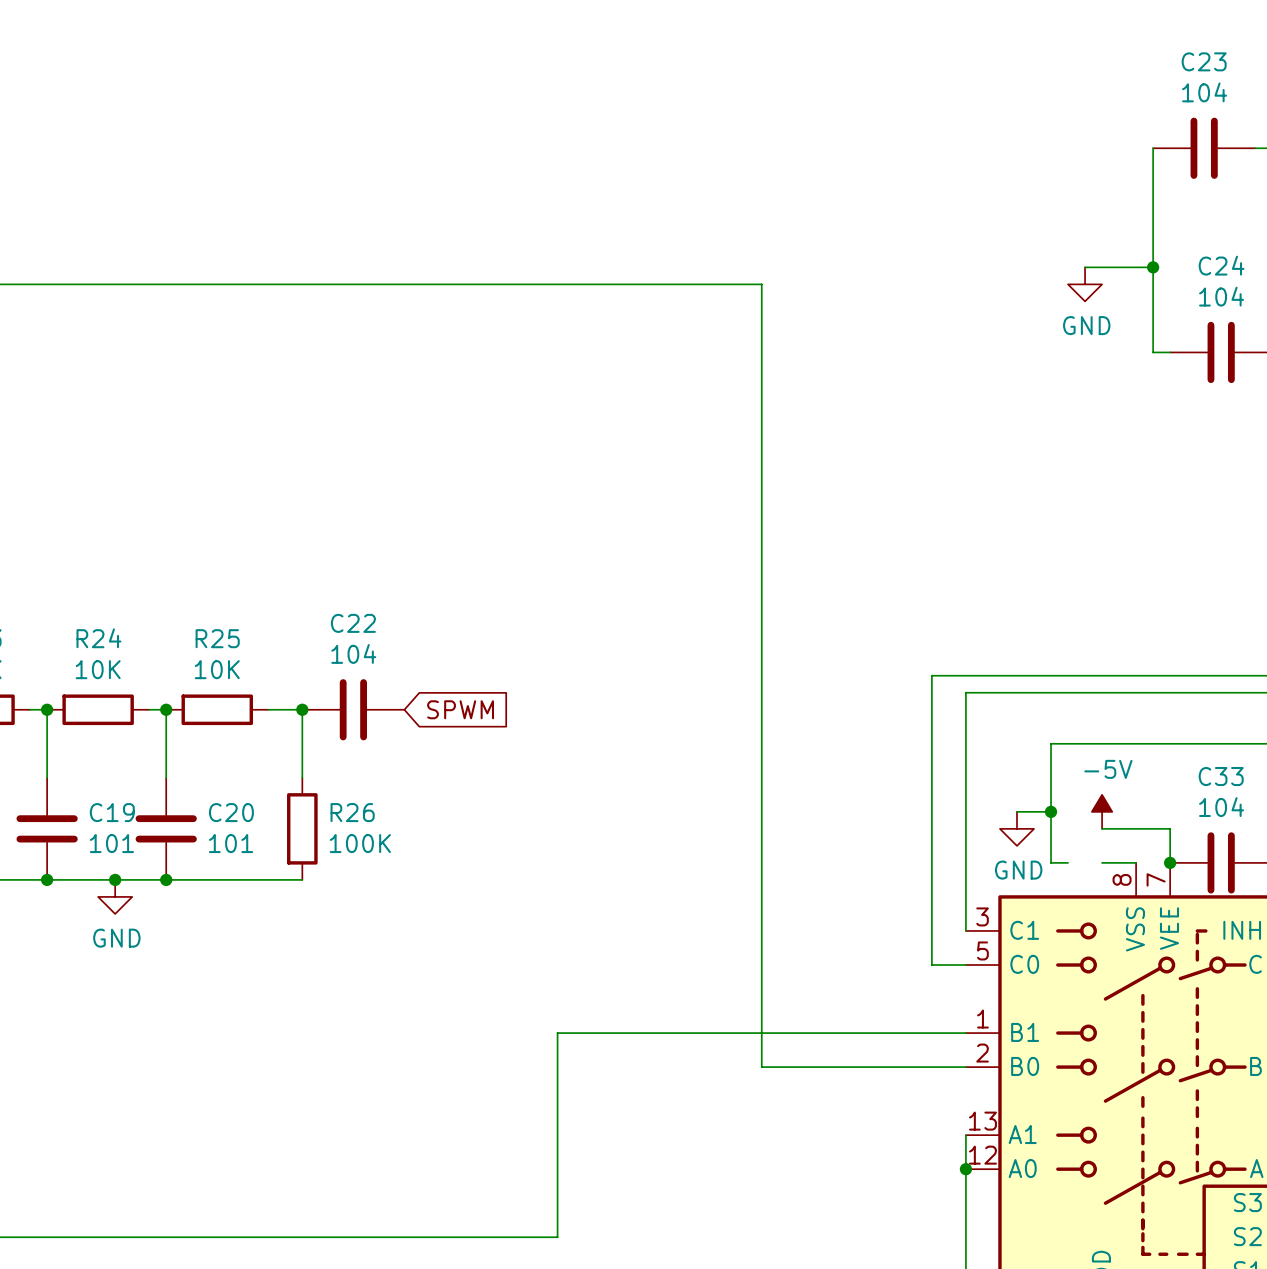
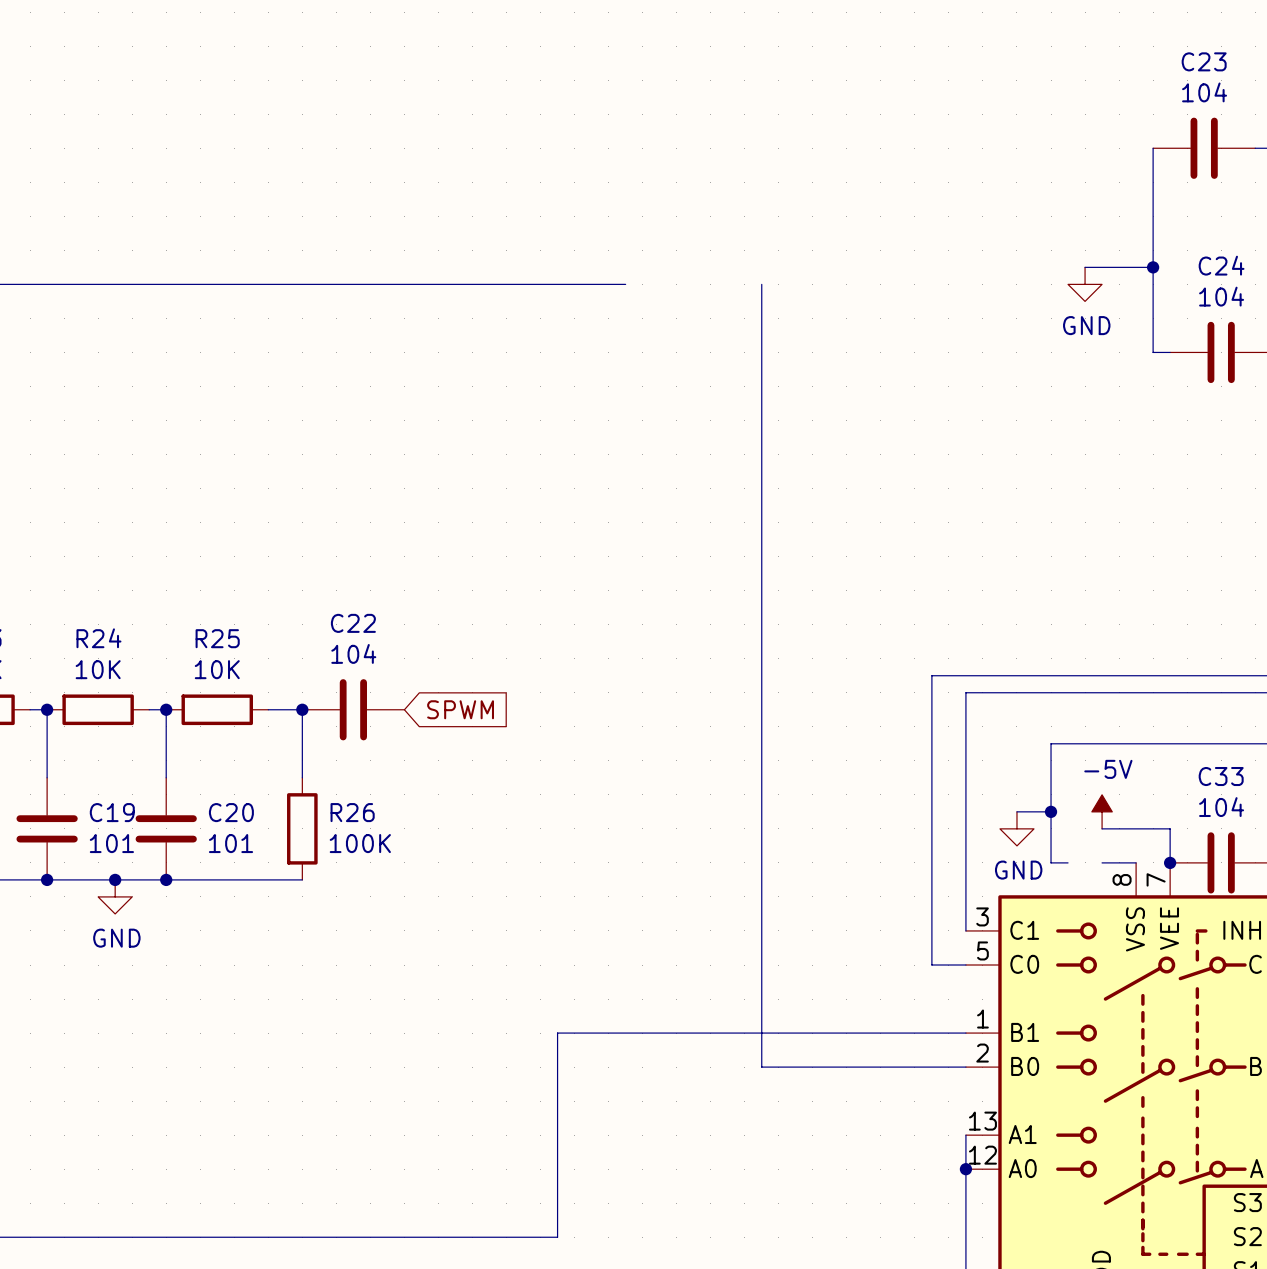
wire: (625, 284) (761, 284) -> none

